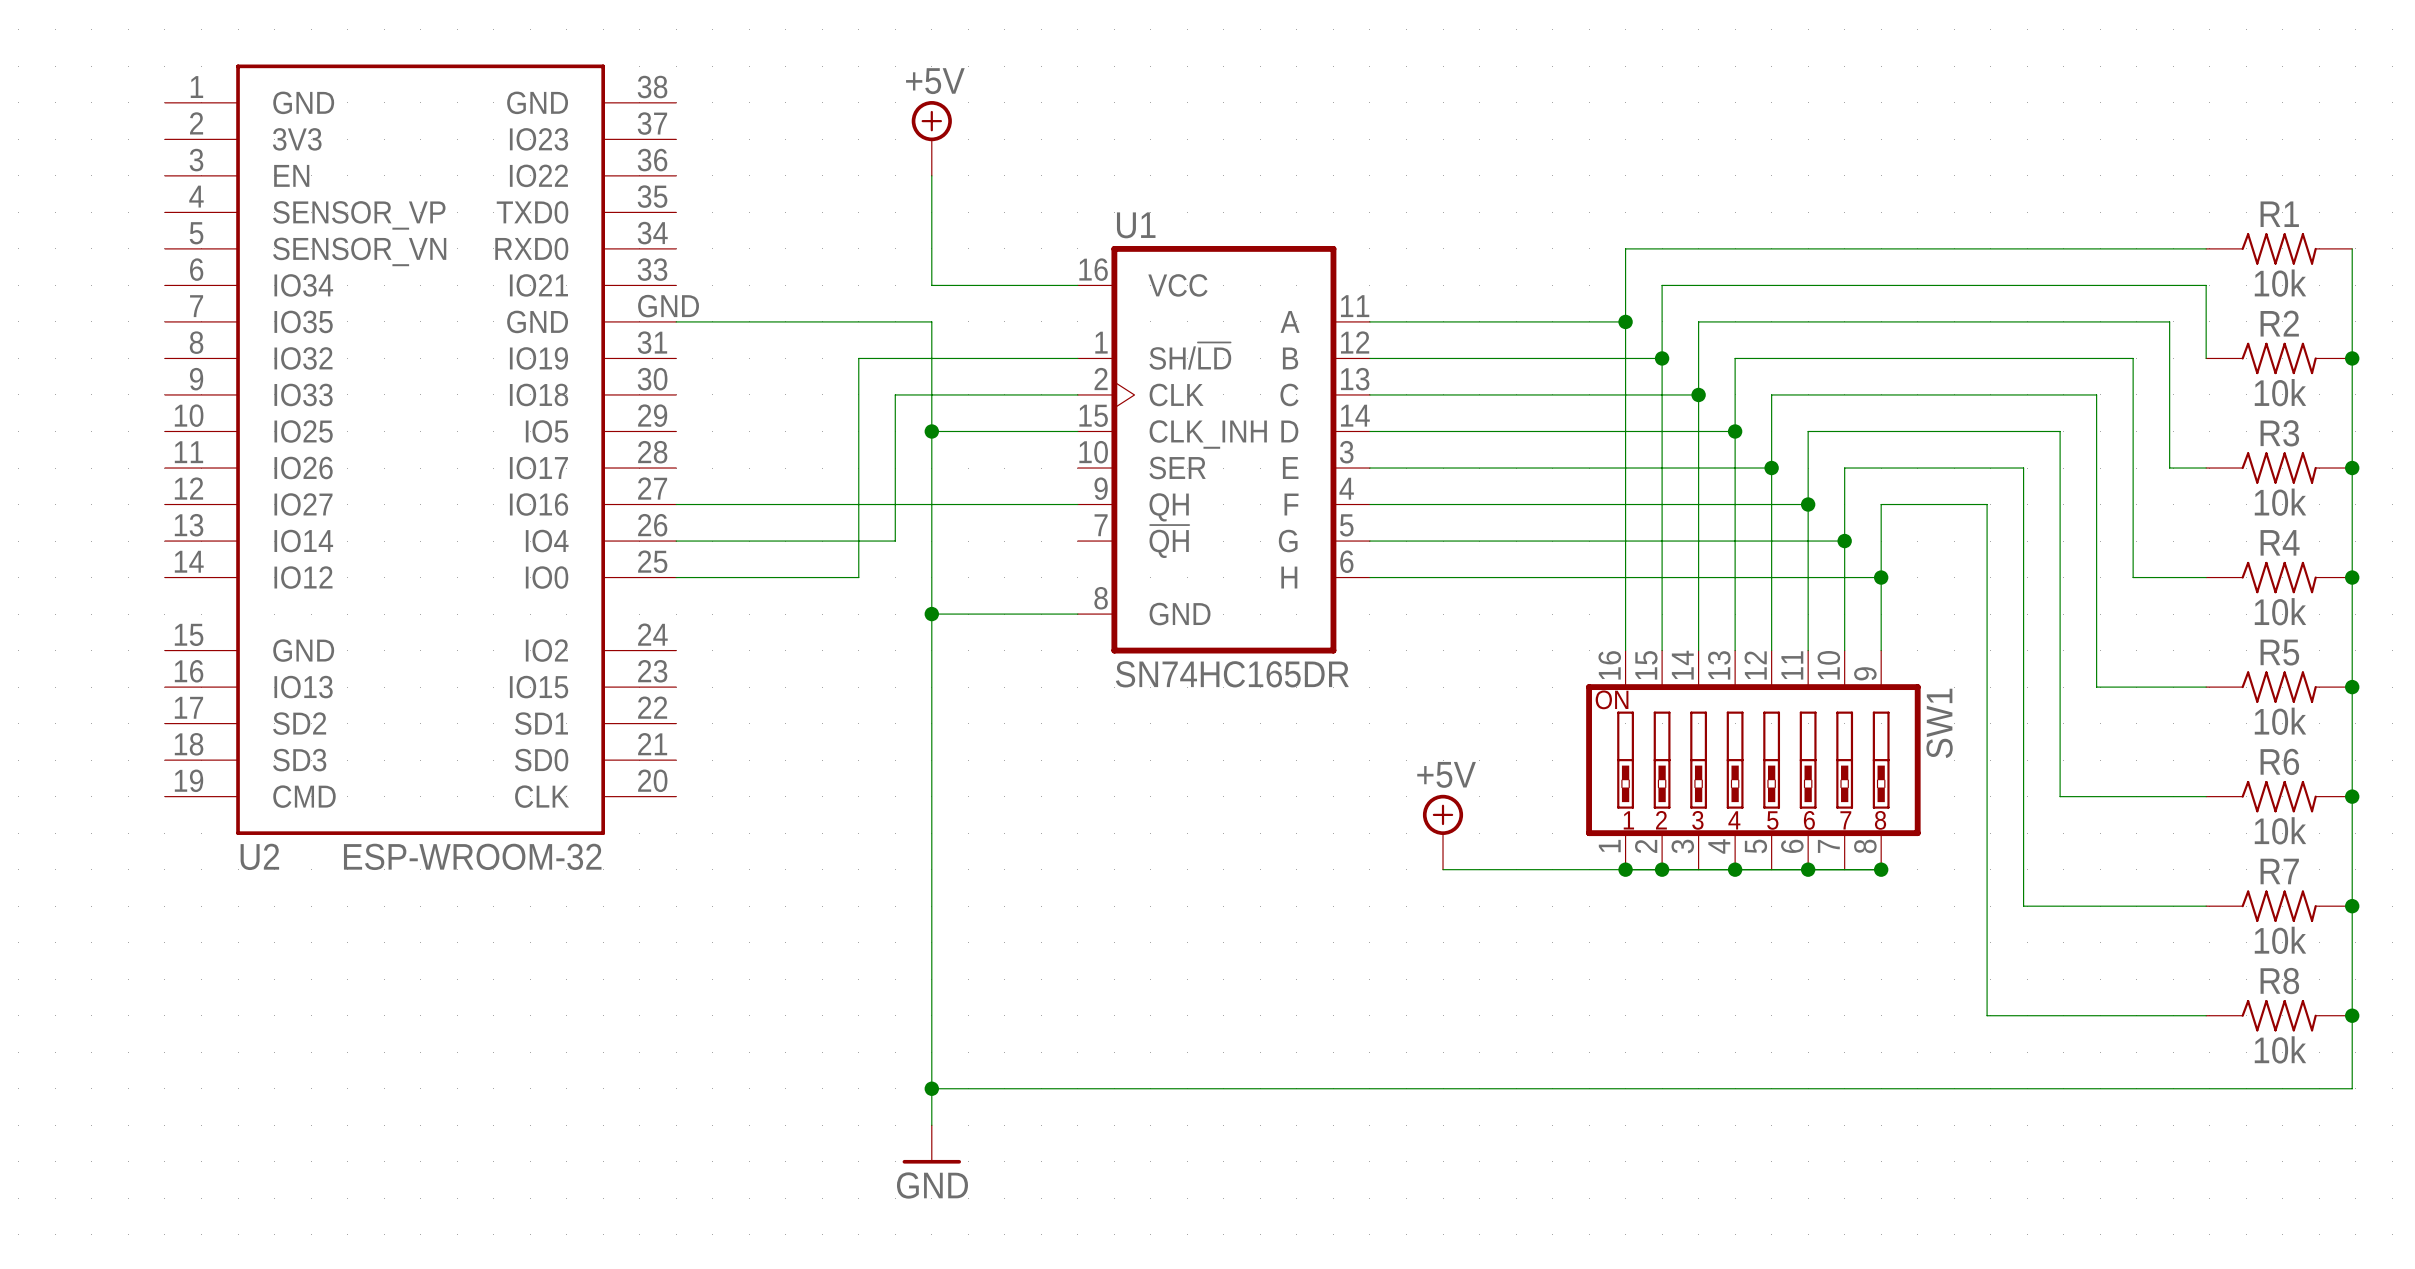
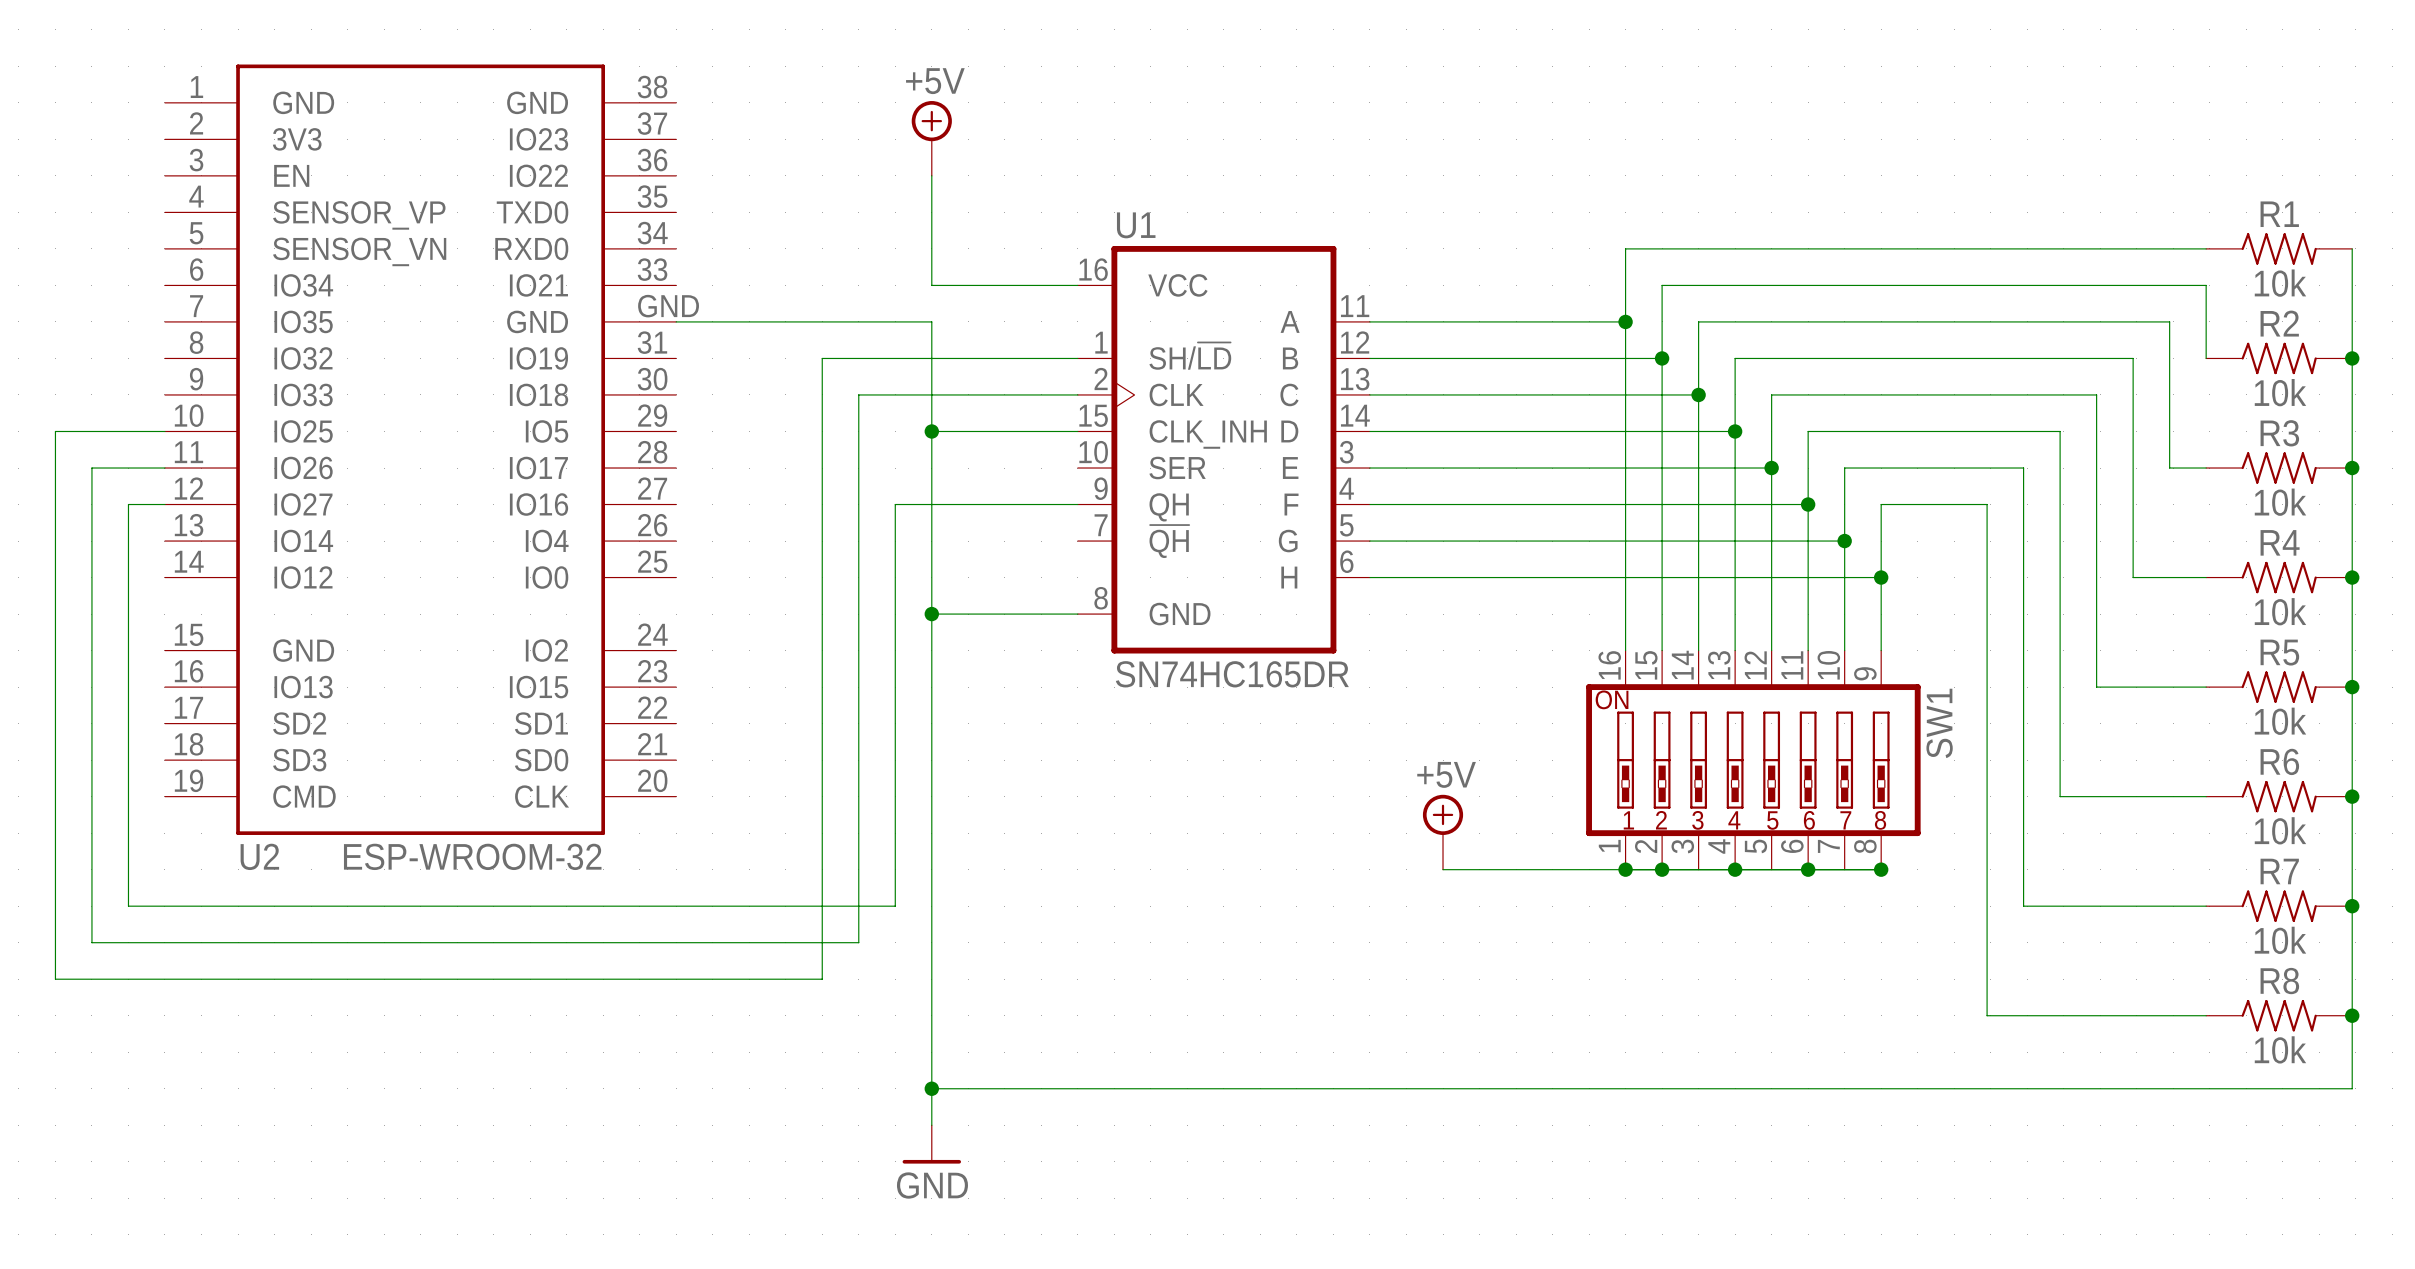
wire: (858, 358) (858, 394) -> (895, 394) (858, 394)
wire: none -> (858, 358) (822, 358) (822, 979) (55, 979) (55, 431) (164, 431)
wire: (895, 394) (895, 504) (676, 504) -> none
wire: (676, 541) (895, 541) -> (164, 504) (128, 504) (128, 906) (895, 906) (895, 541)
wire: (676, 577) (858, 577) -> (164, 468) (91, 468) (91, 942) (858, 942) (858, 577)

